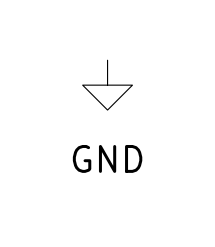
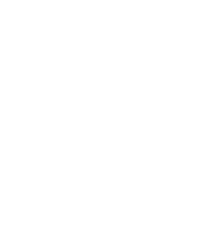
power symbol: GND (107, 85) -> none

